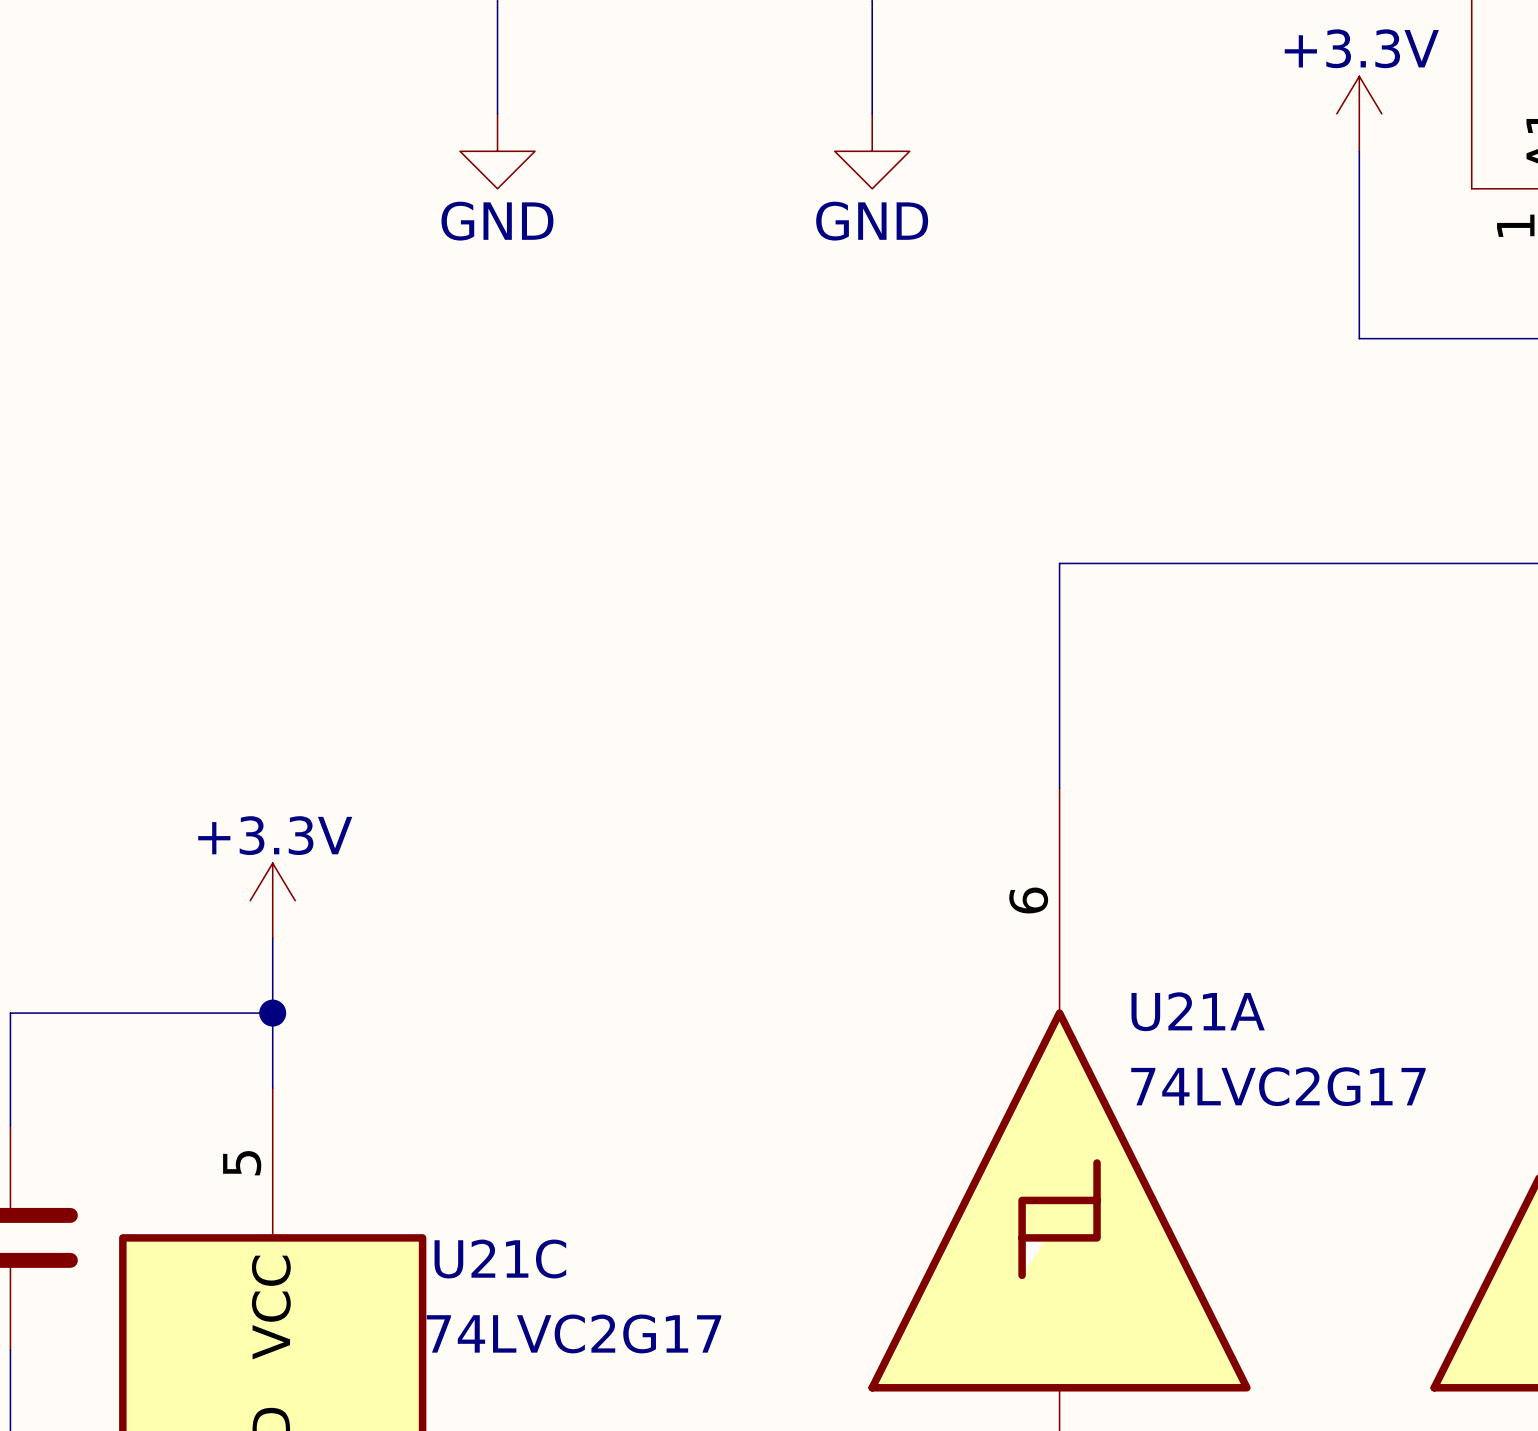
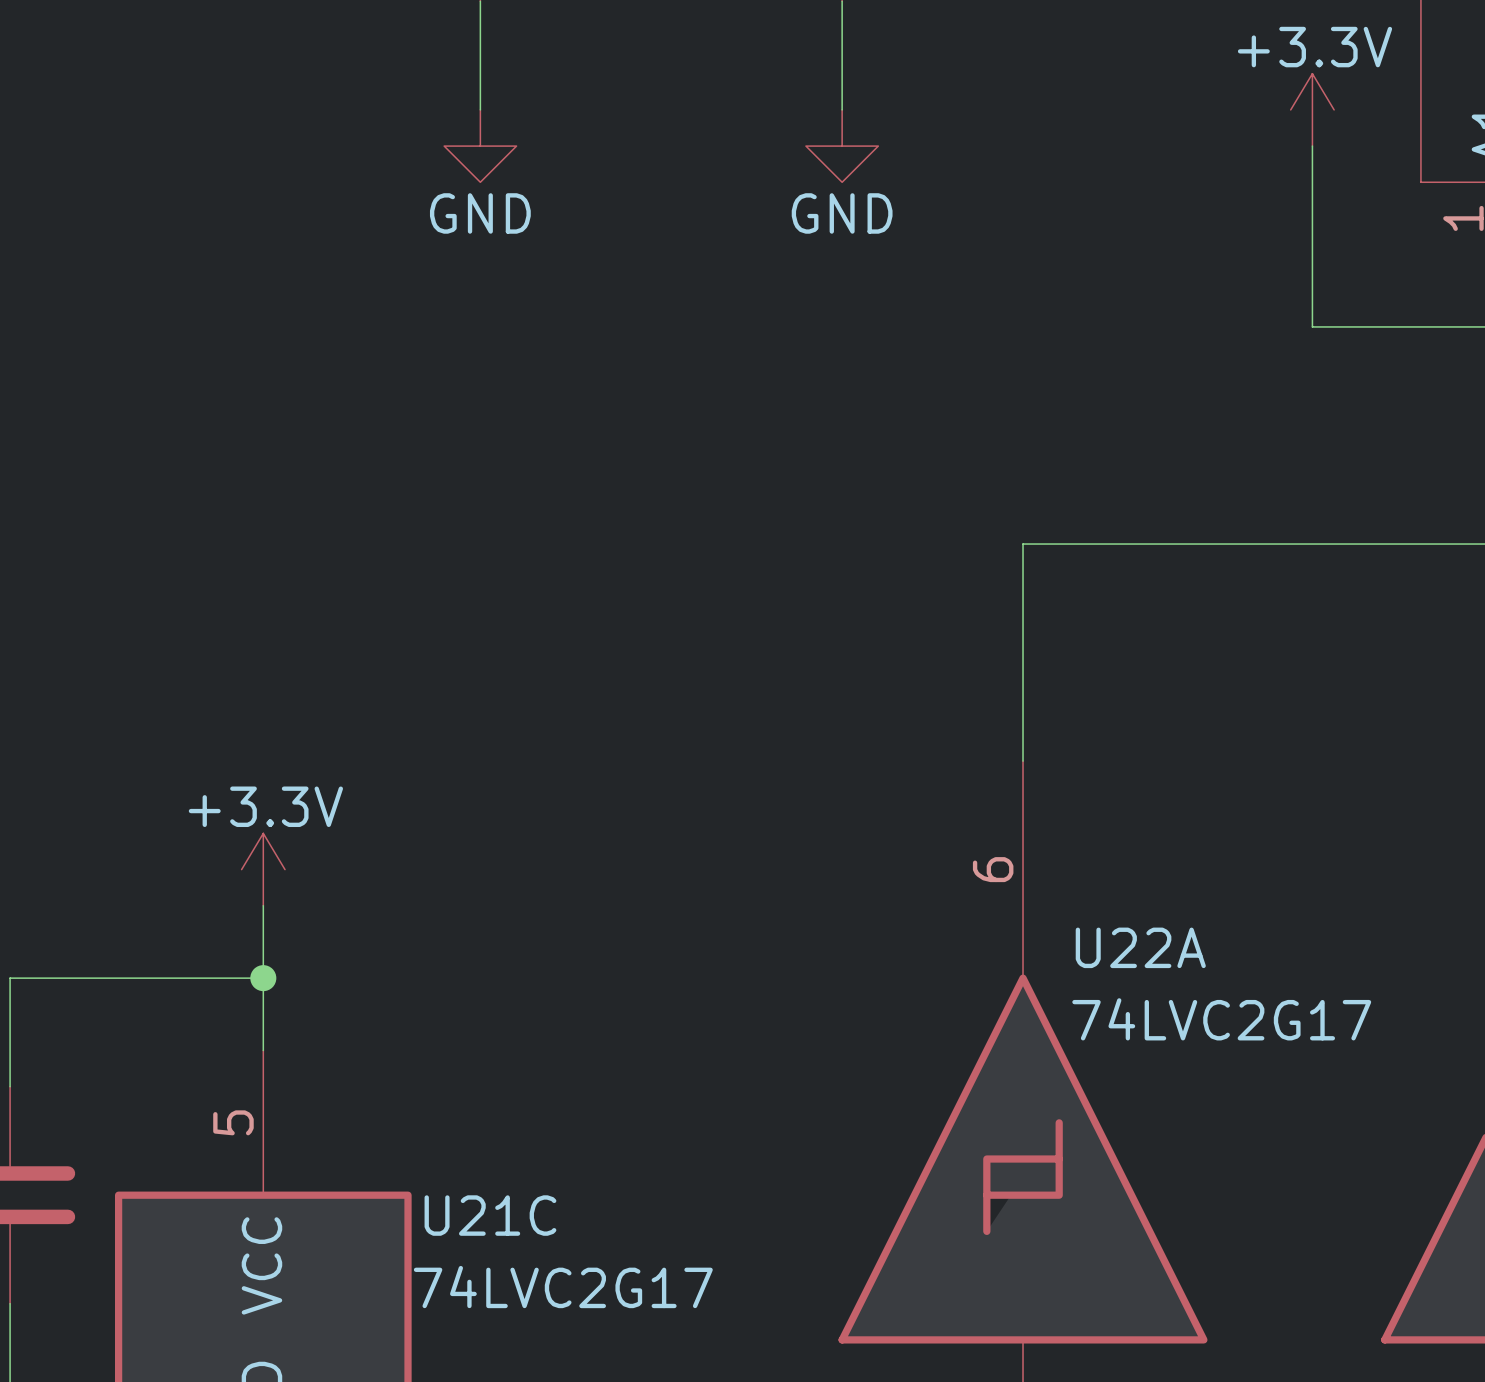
U21A name: U21A (1198, 1011) -> U22A (1140, 947)
U21A value position: 74LVC2G17 (1278, 1086) -> 74LVC2G17 (1221, 1019)

